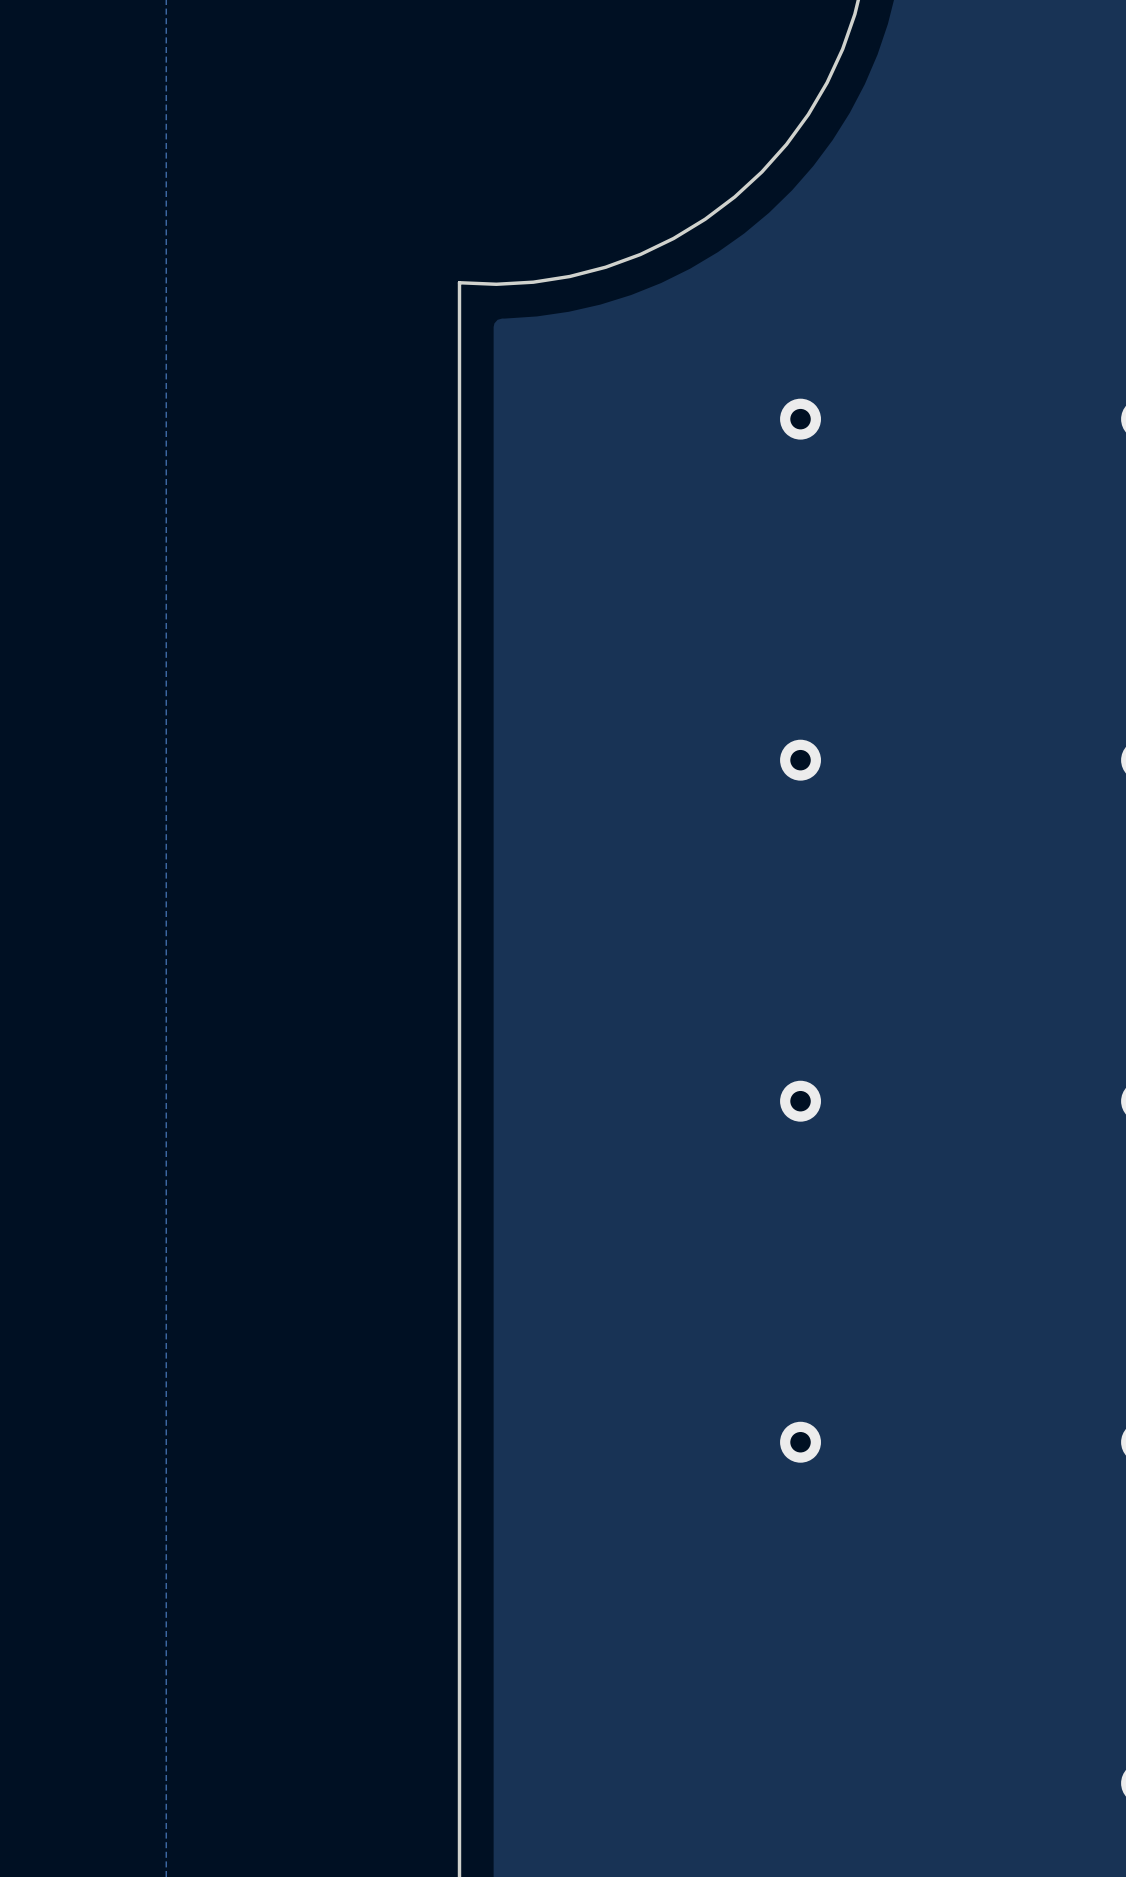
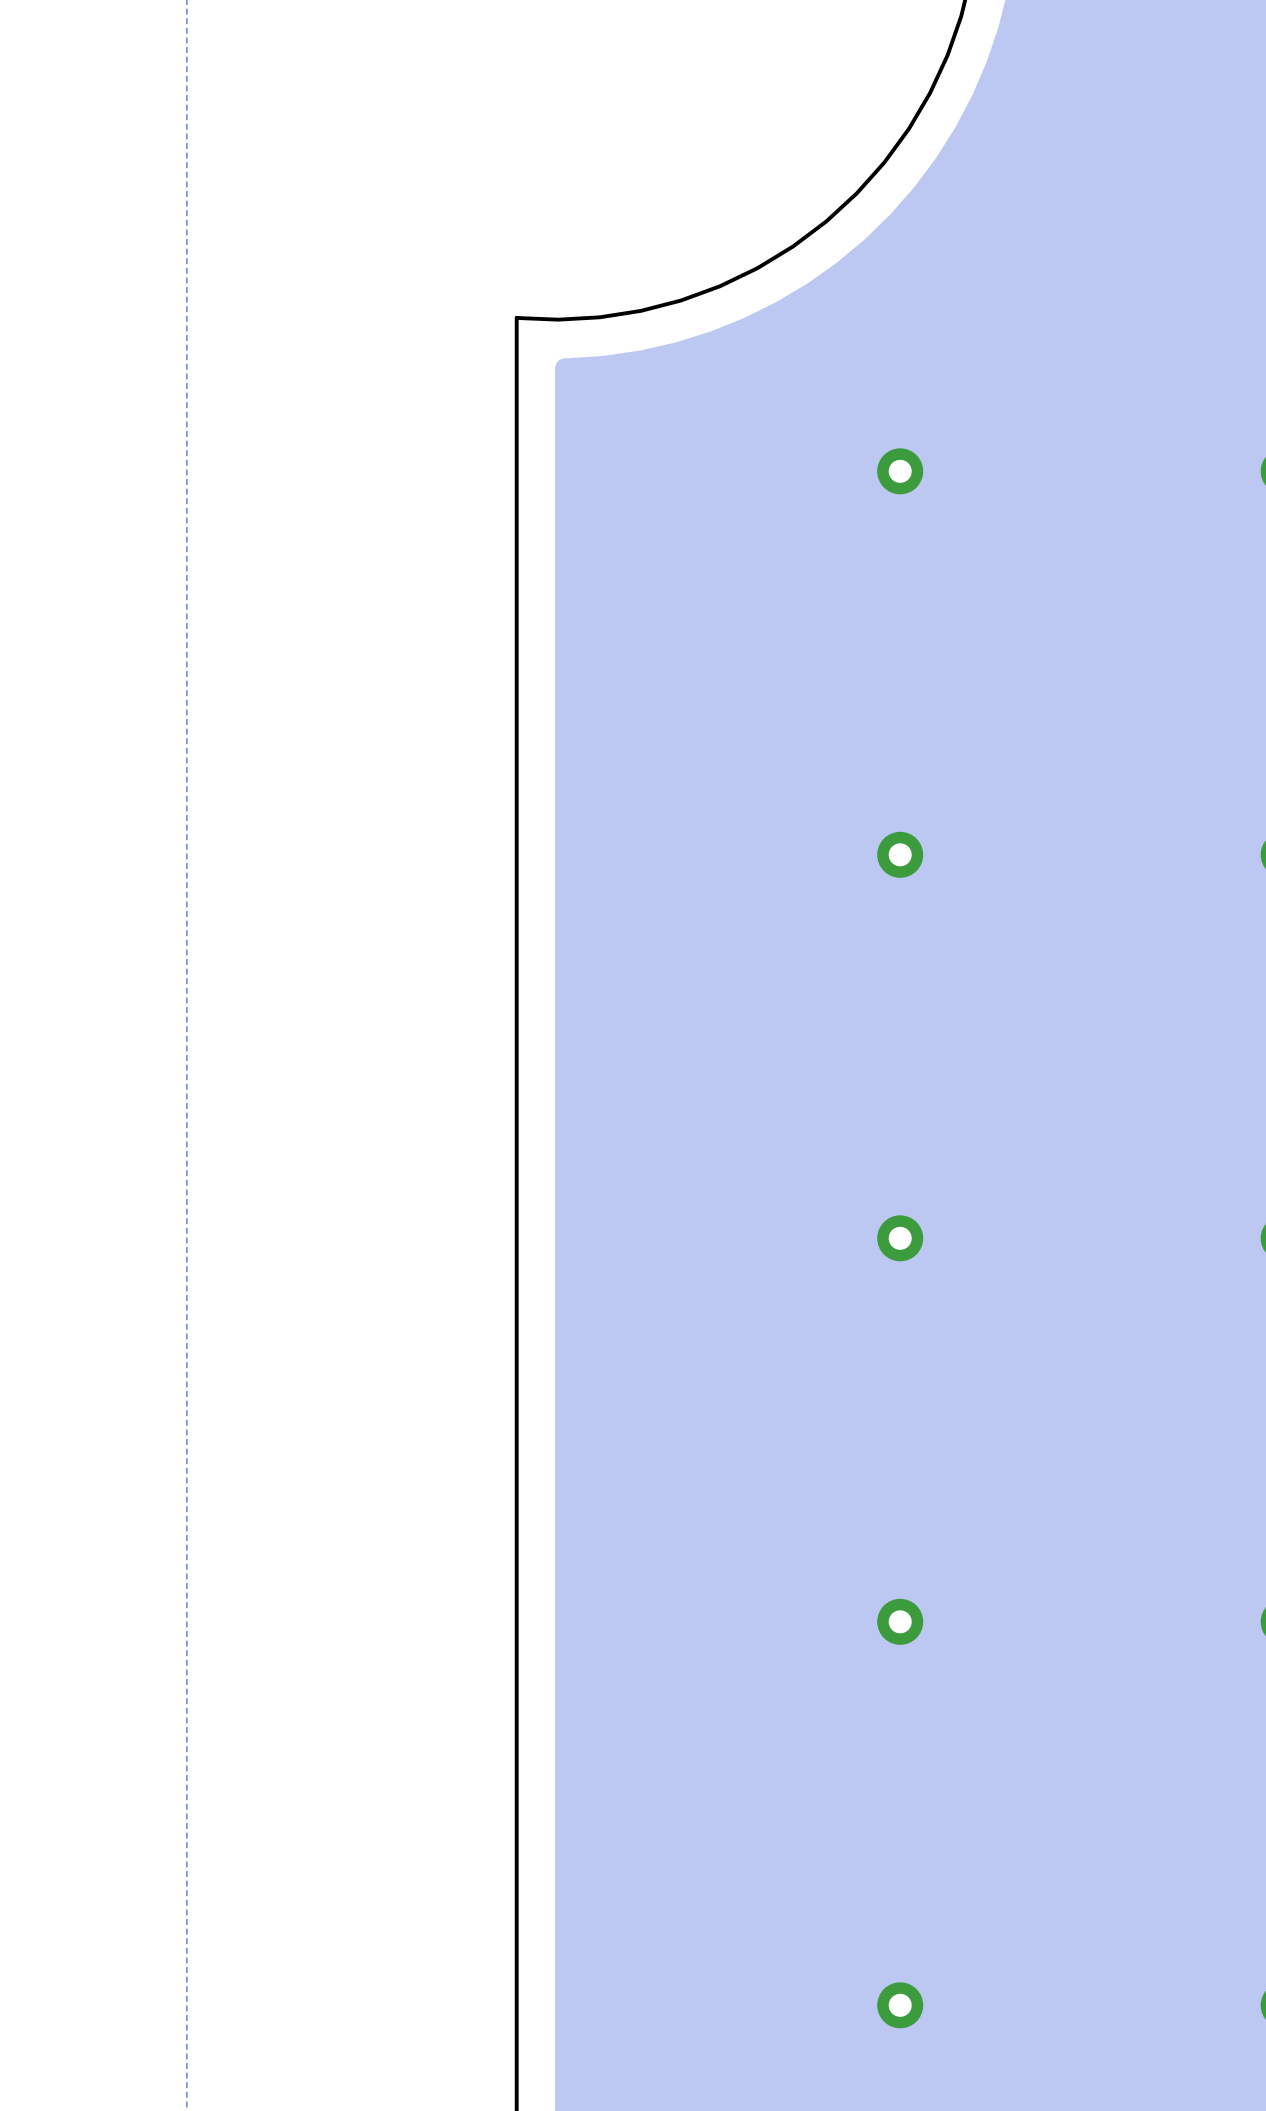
via: none -> (900, 2005)

